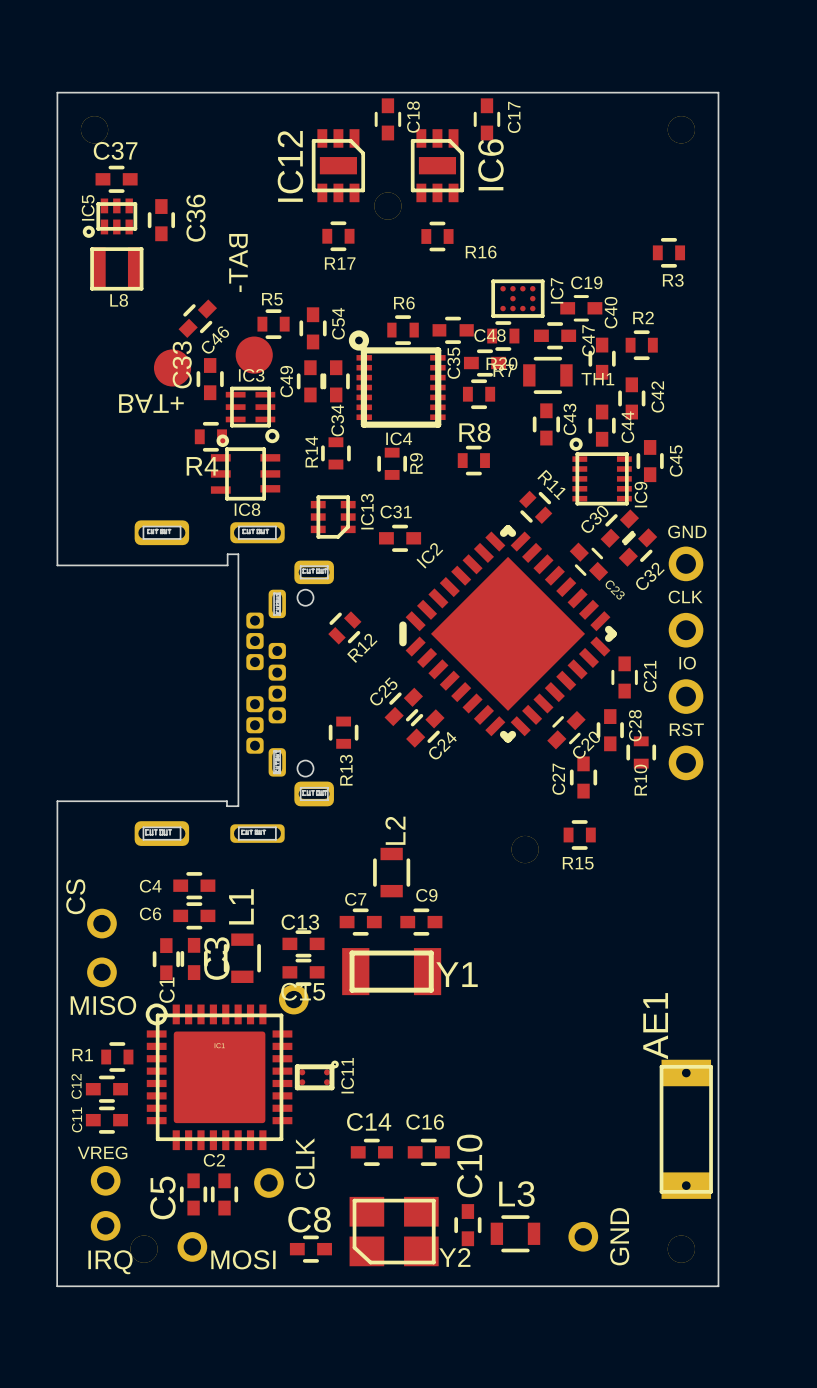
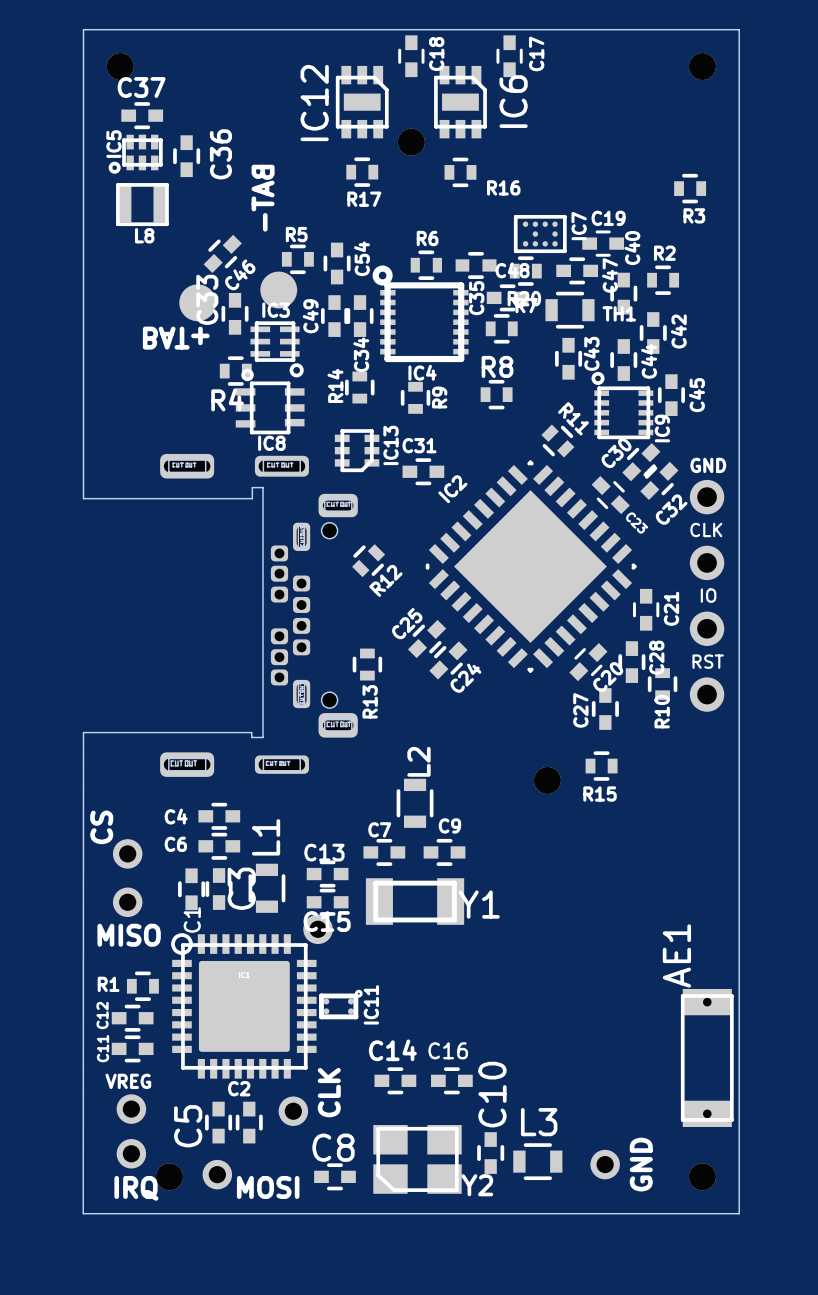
IC2 footprint: [399, 525, 617, 743] -> [425, 460, 637, 673]

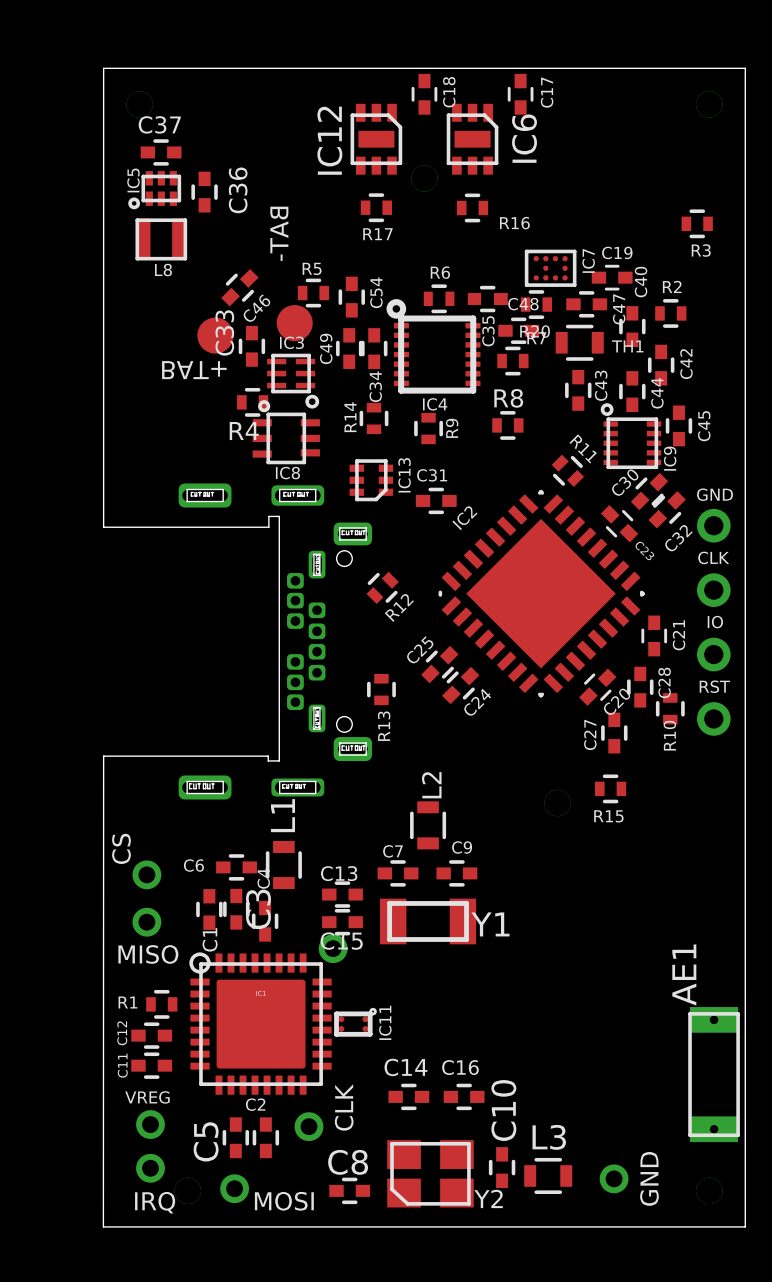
C4 rotation: 0° (219, 816) -> 90° clockwise (265, 921)
C4 position: (219, 816) -> (265, 921)
L1 position: (266, 888) -> (283, 865)

